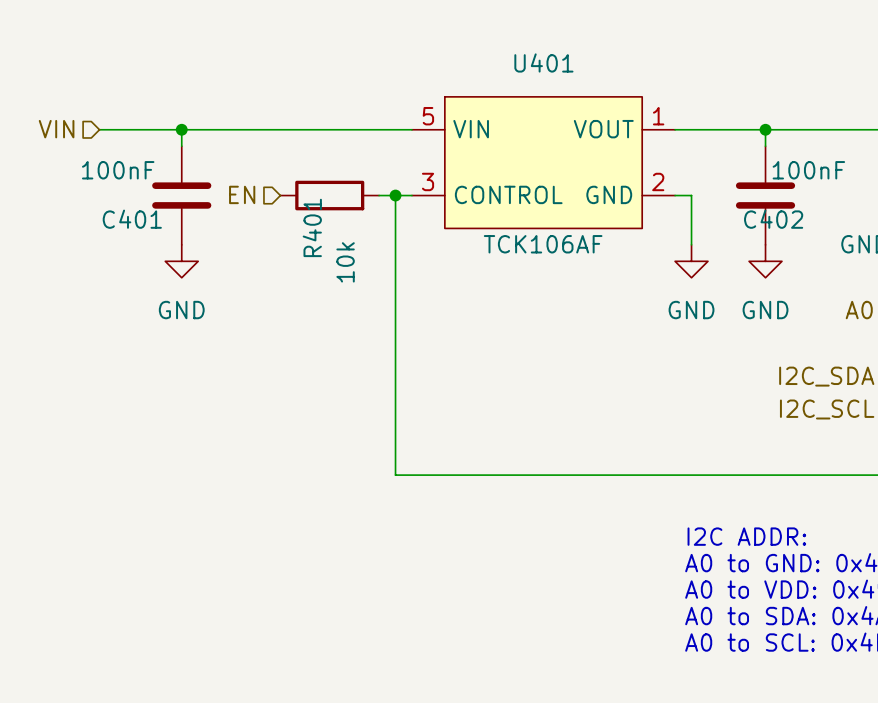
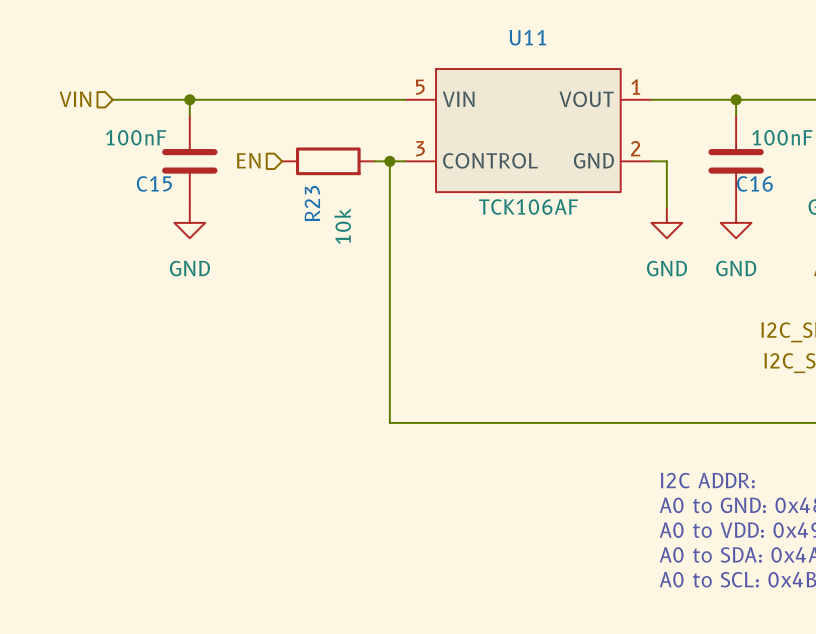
U401 name: U401 (543, 62) -> U11 (527, 37)
C401 name: C401 (132, 219) -> C15 (154, 183)
C402 name: C402 (773, 219) -> C16 (754, 183)
R401 name: R401 (312, 227) -> R23 (312, 203)

